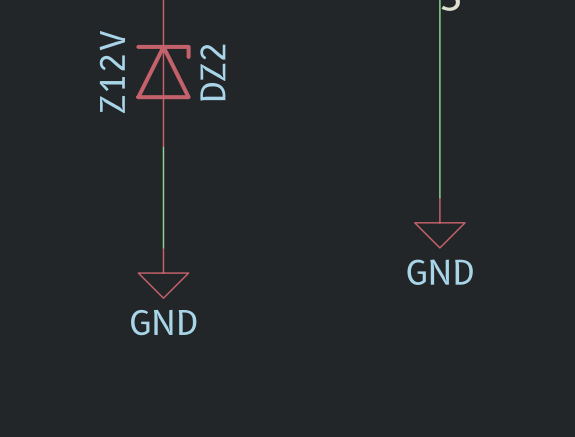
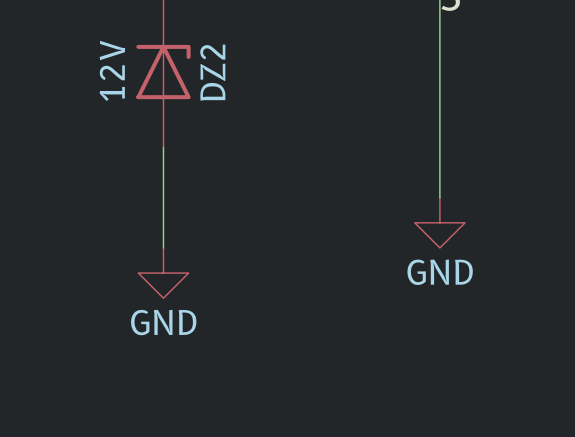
DZ2 value: Z12V (112, 72) -> 12V (112, 70)

